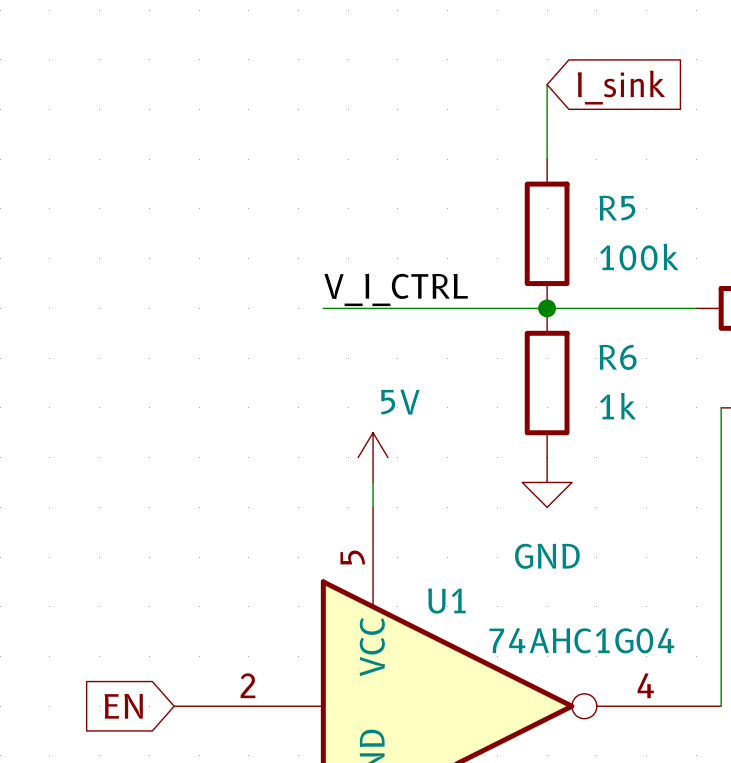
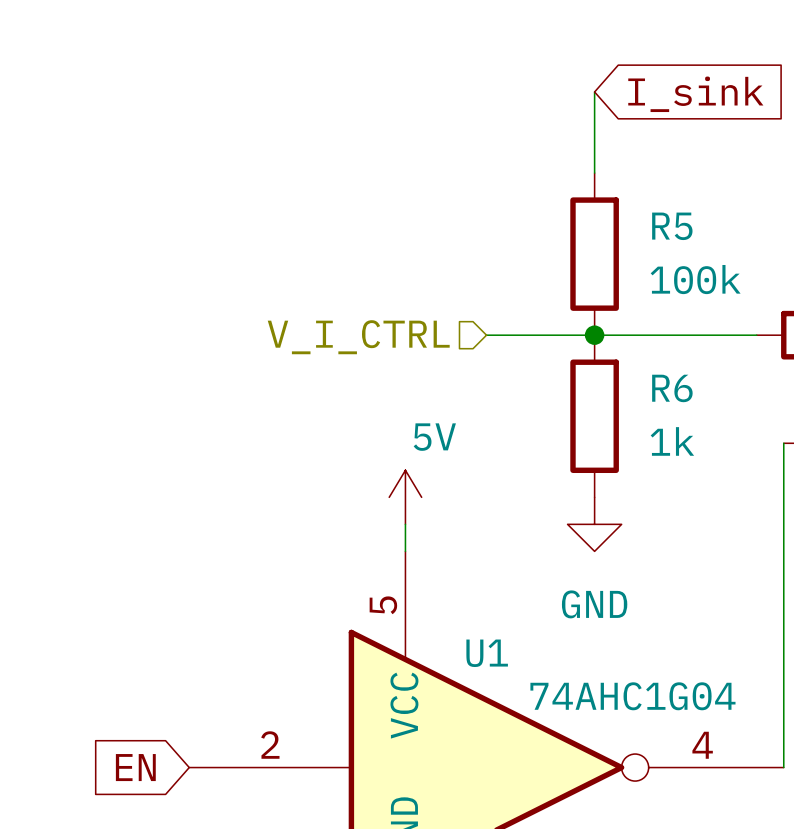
label: V_I_CTRL (396, 289) -> none
wire: (323, 308) (447, 308) -> none
hierarchical label: none -> V_I_CTRL (358, 337)

